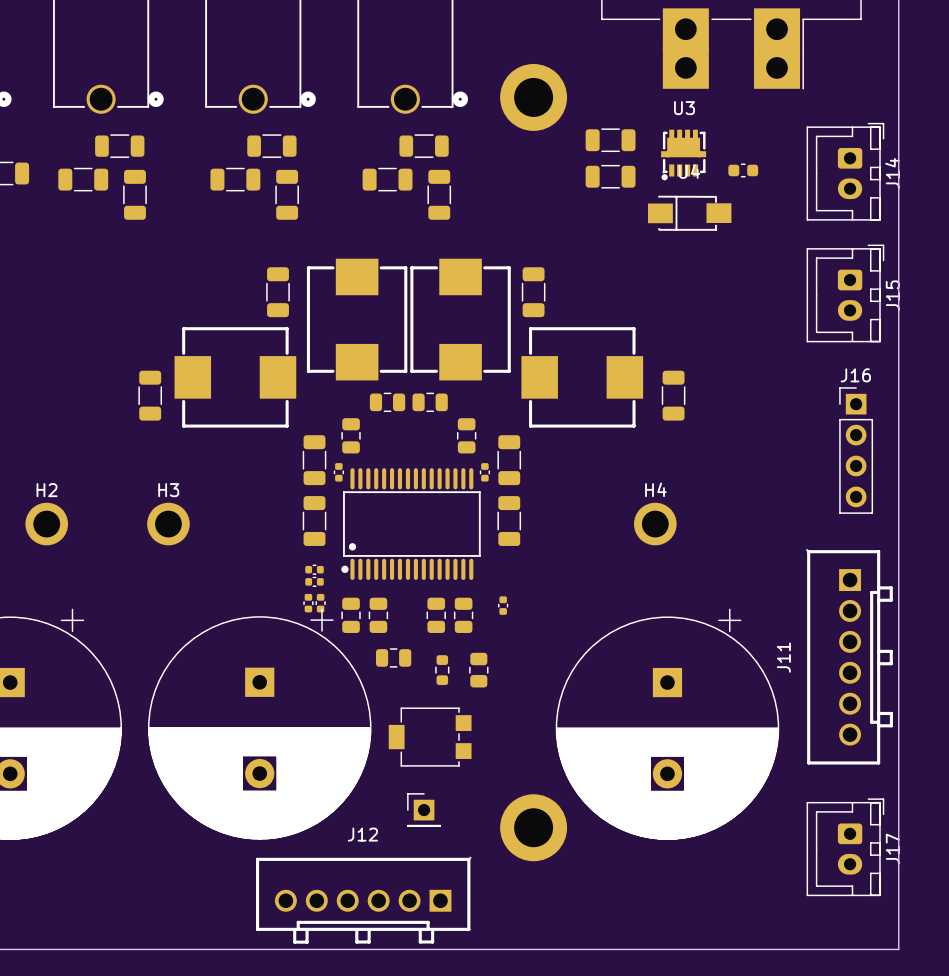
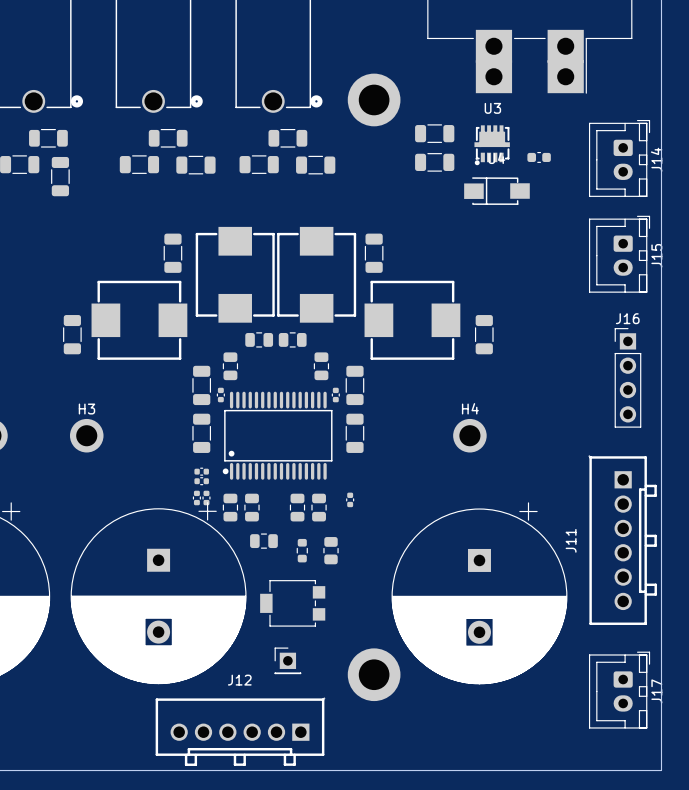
part rotation: 0° (287, 194) -> 90° clockwise (195, 165)
part rotation: 0° (439, 194) -> 90° clockwise (315, 165)

